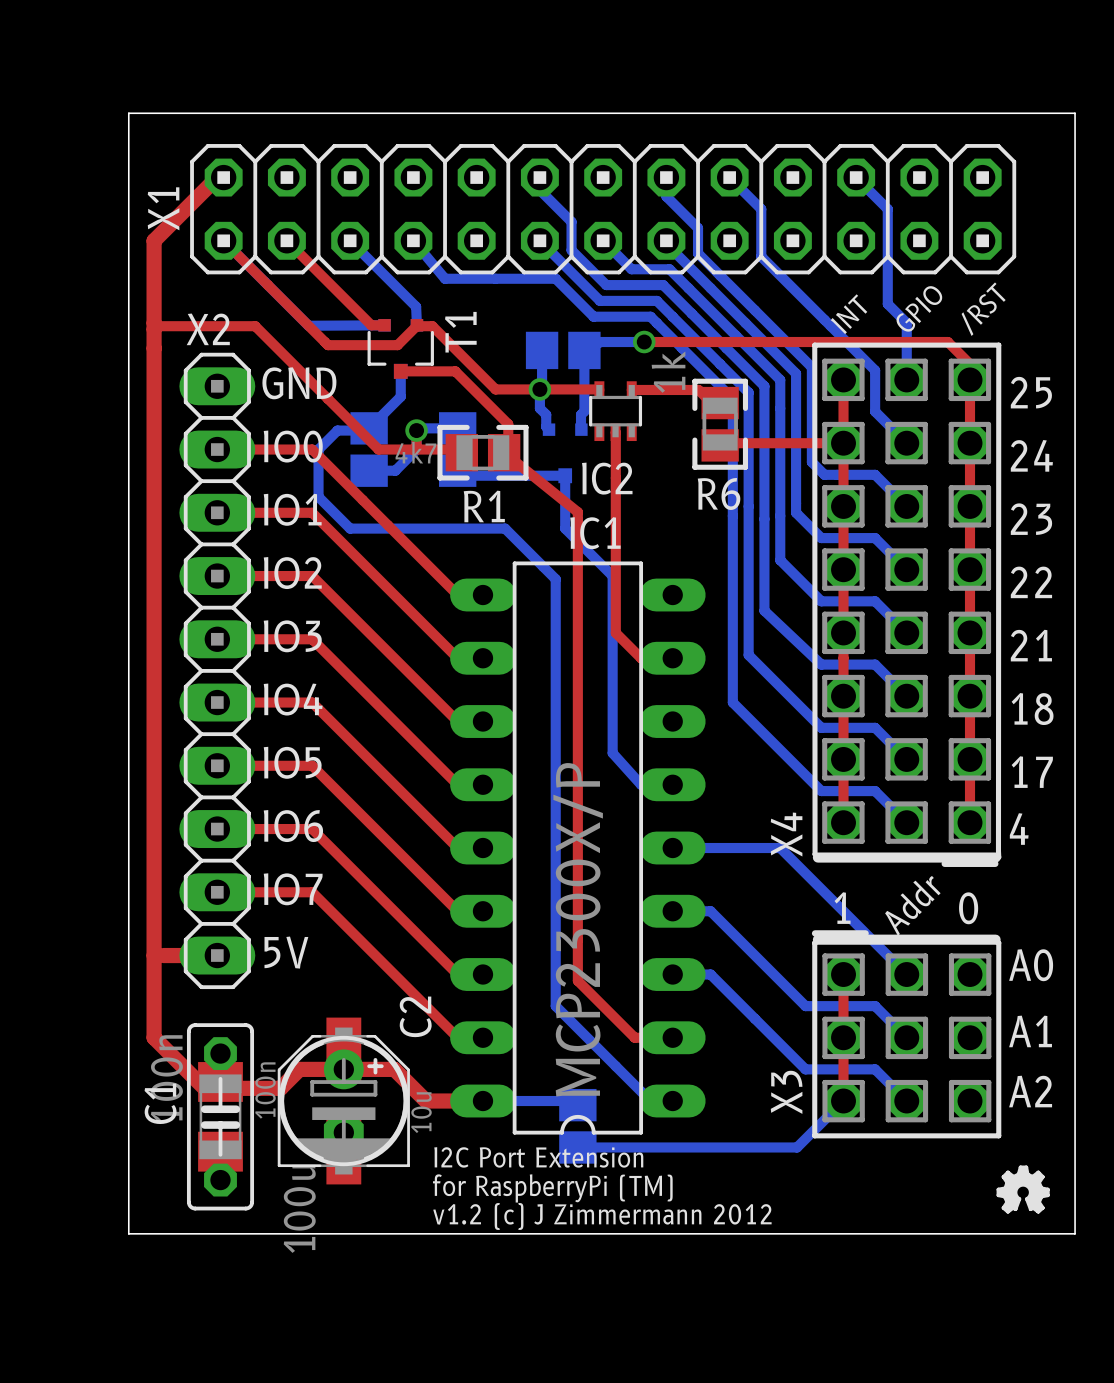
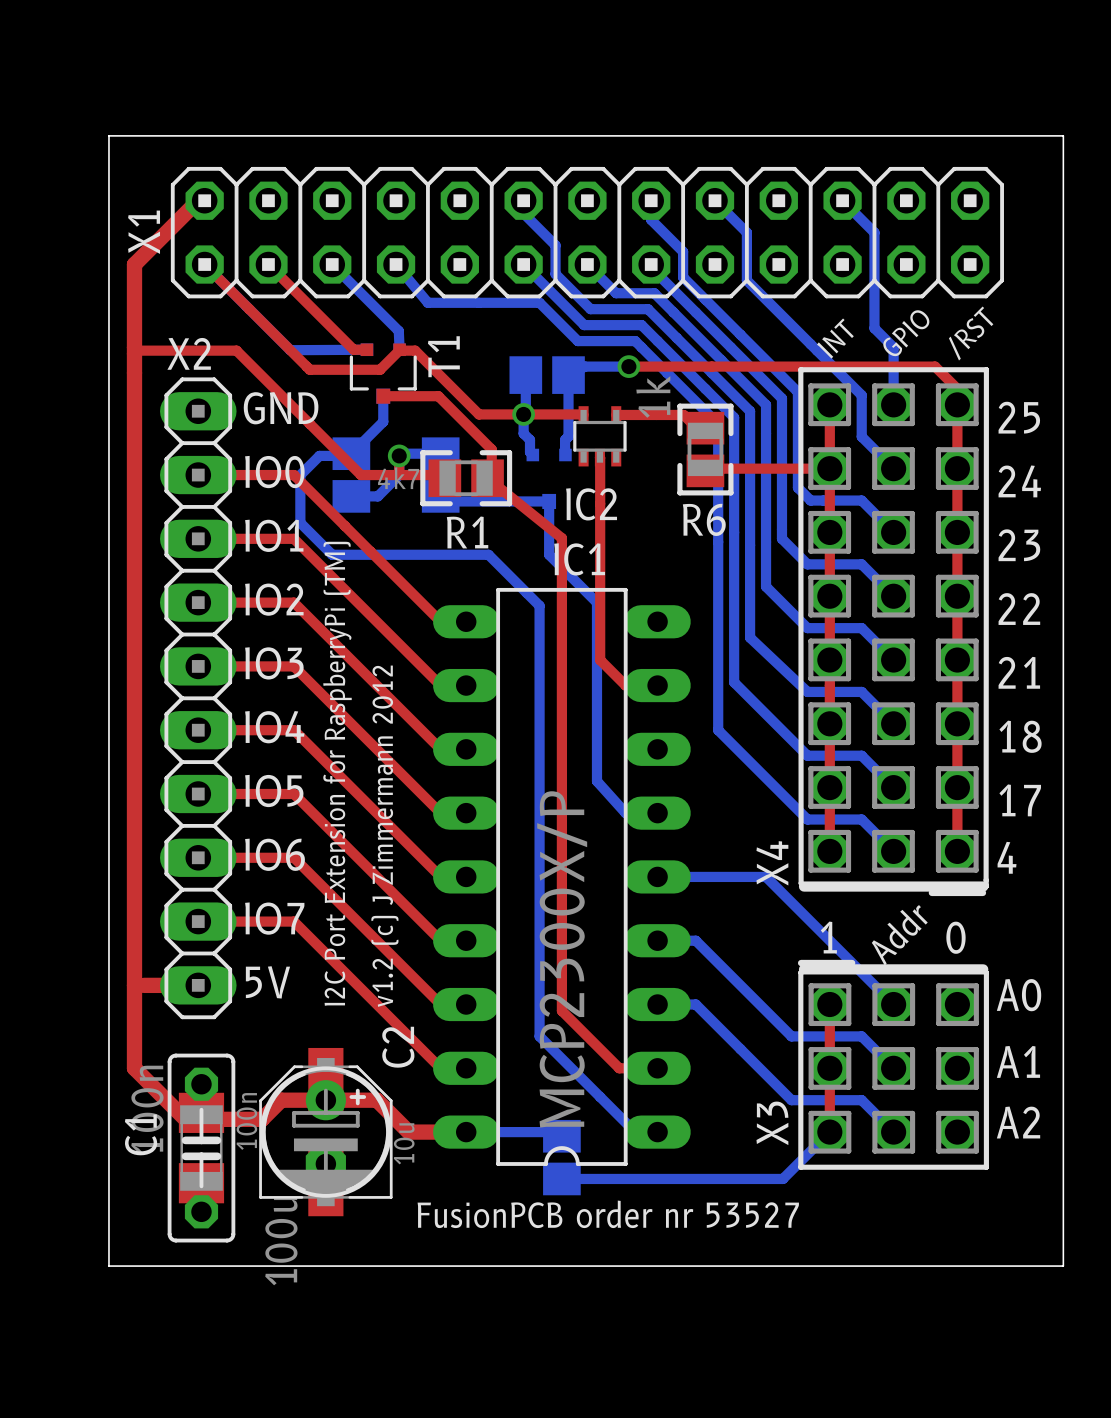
text: none -> I2C Port Extension for RaspberryPi (TM) (337, 773)
text: I2C Port Extension (538, 1157) -> none
drawing: [996, 1165, 1050, 1214] -> none
text: for RaspberryPi (TM) (552, 1188) -> FusionPCB order nr 53527 (608, 1214)
text rotation: 0° (602, 1216) -> 90° counterclockwise (384, 836)
text position: v1.2 (c) J Zimmermann 2012 (602, 1216) -> v1.2 (c) J Zimmermann 2012 (384, 836)

